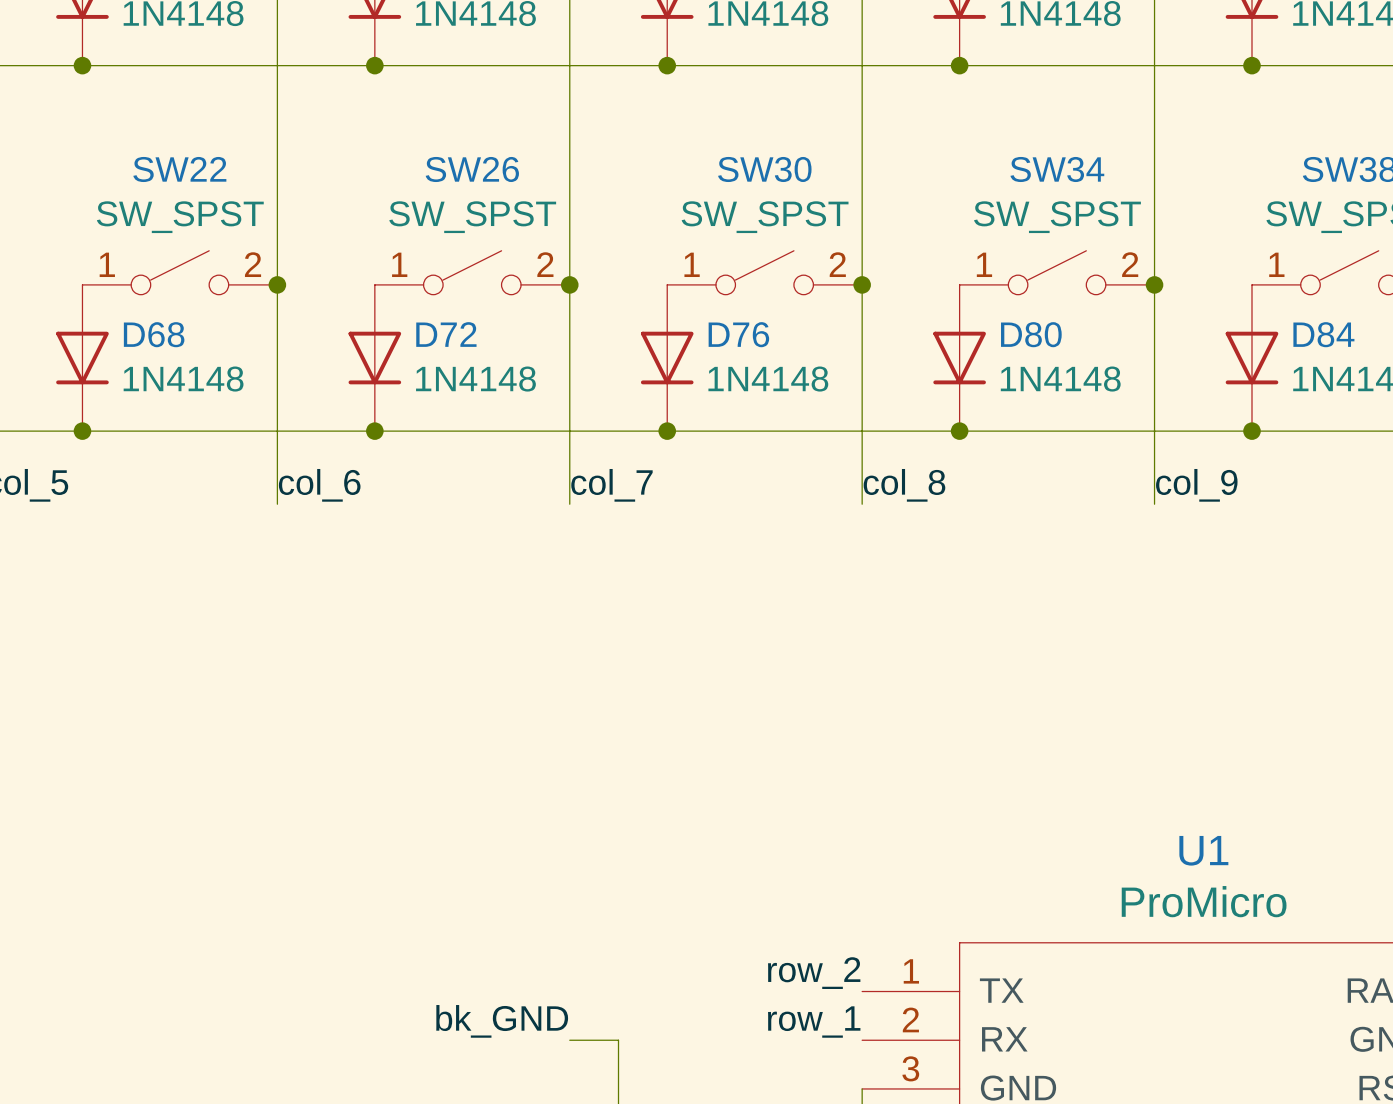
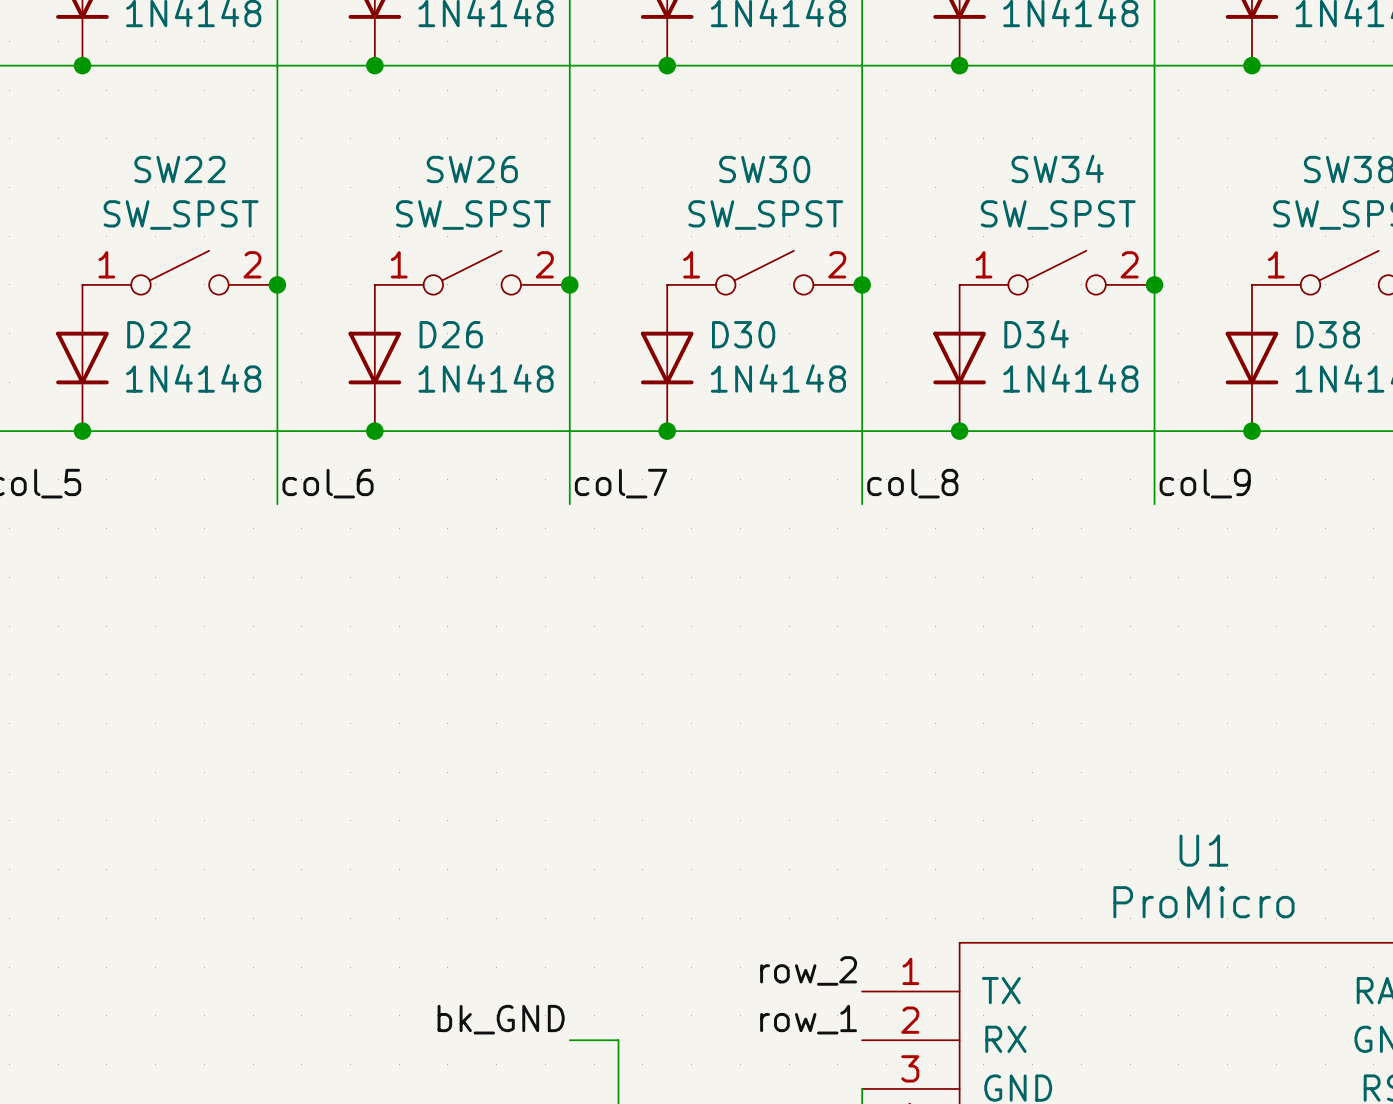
D68 name: D68 (154, 334) -> D22 (158, 334)
D72 name: D72 (446, 334) -> D26 (451, 334)
D76 name: D76 (738, 334) -> D30 (743, 334)
D80 name: D80 (1031, 334) -> D34 (1036, 334)
D84 name: D84 (1323, 334) -> D38 (1328, 334)

